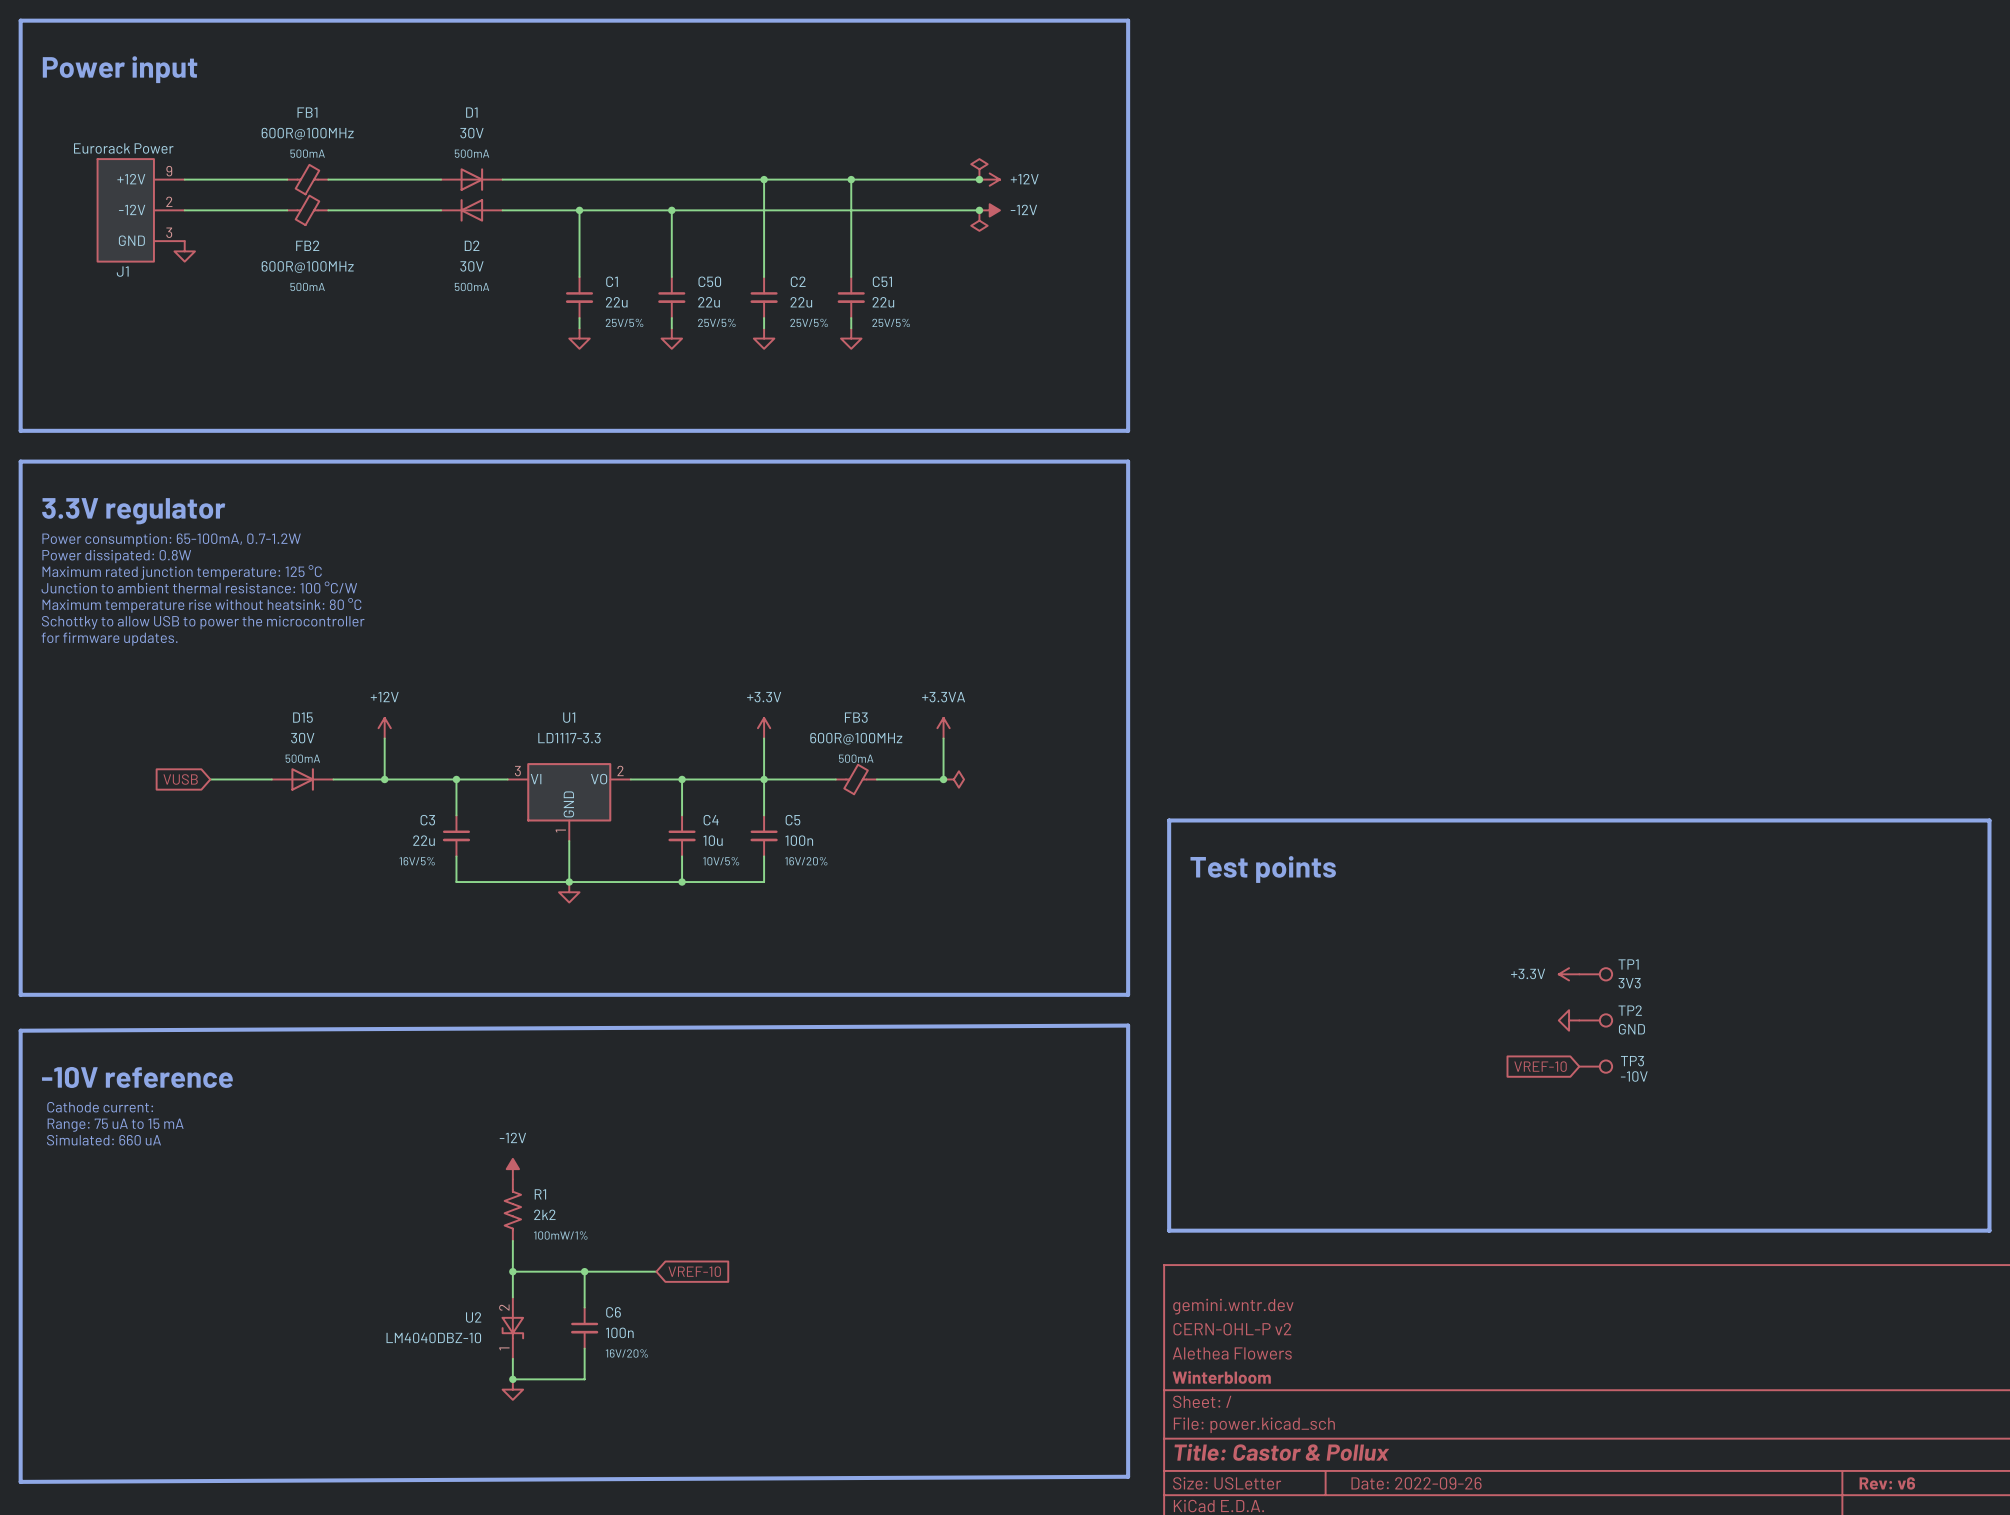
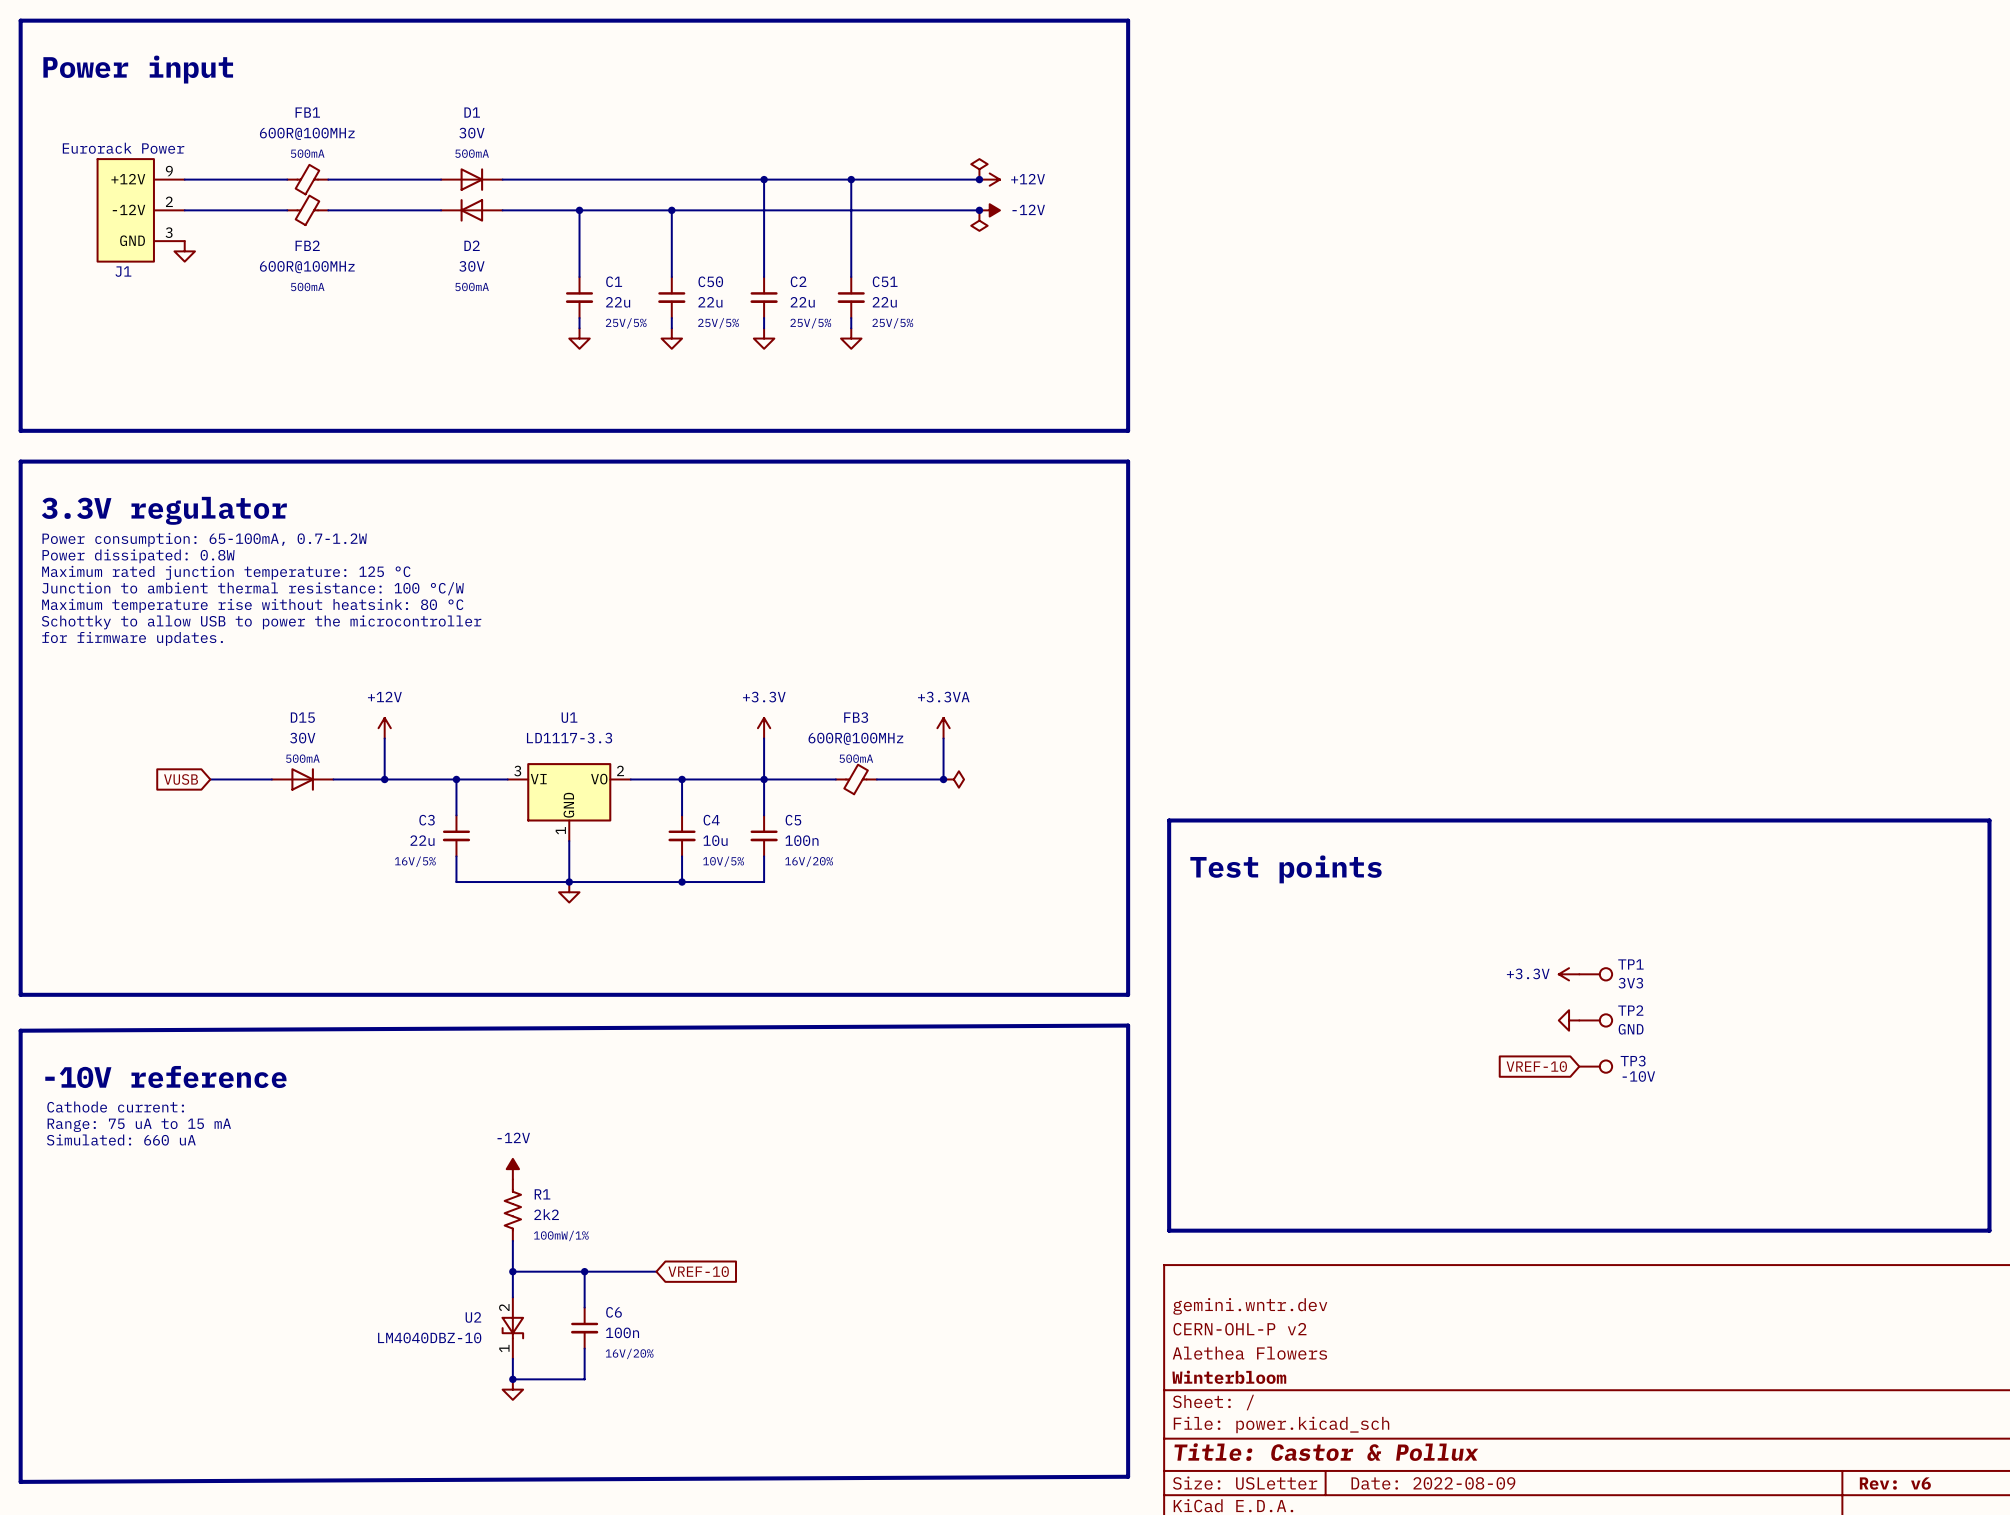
title block: Date: 2022-09-26 (1416, 1483) -> Date: 2022-08-09 (1433, 1483)

